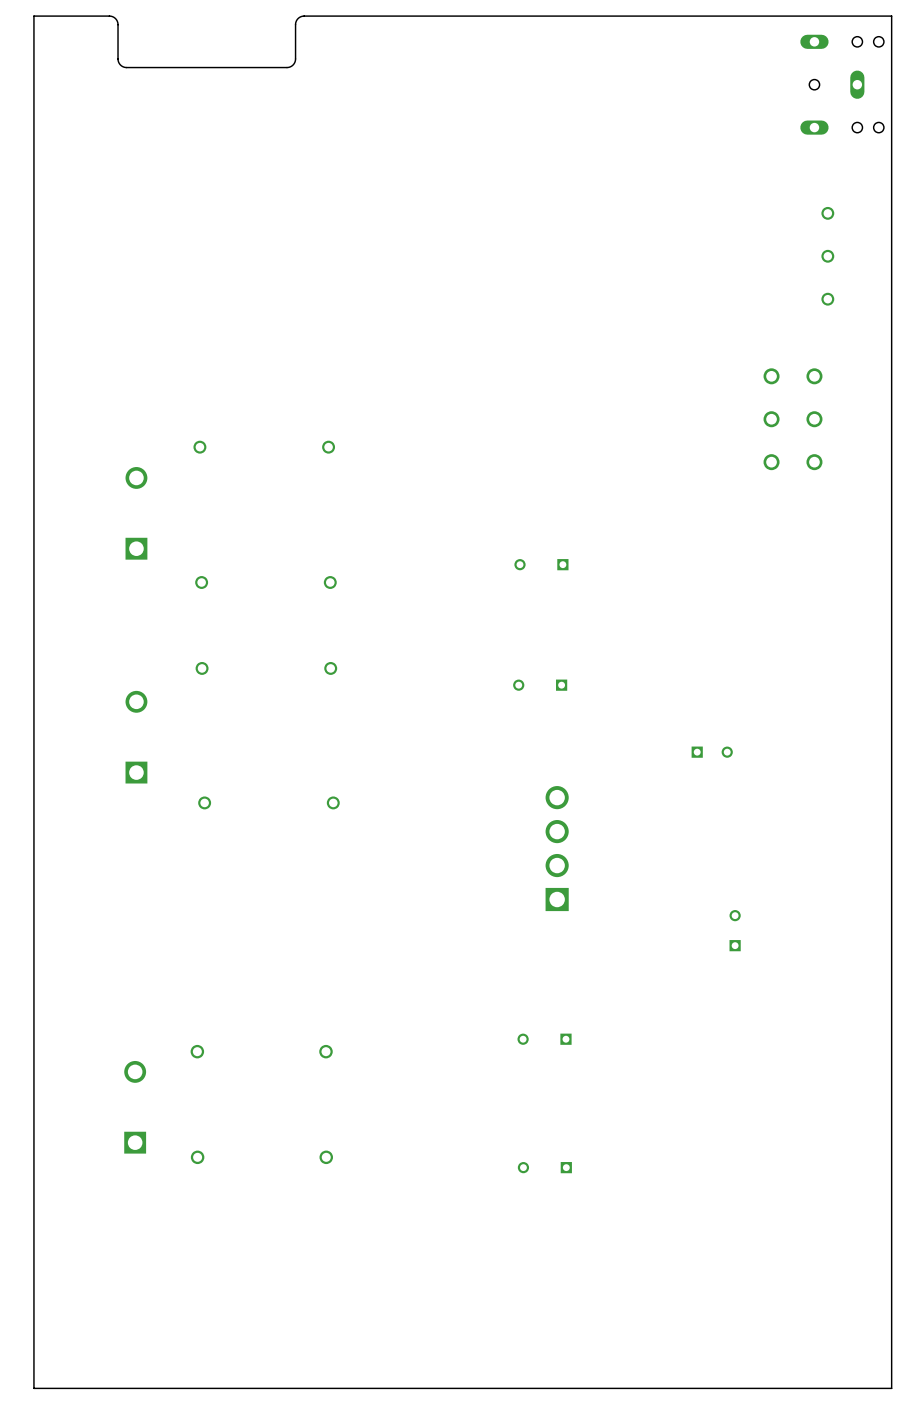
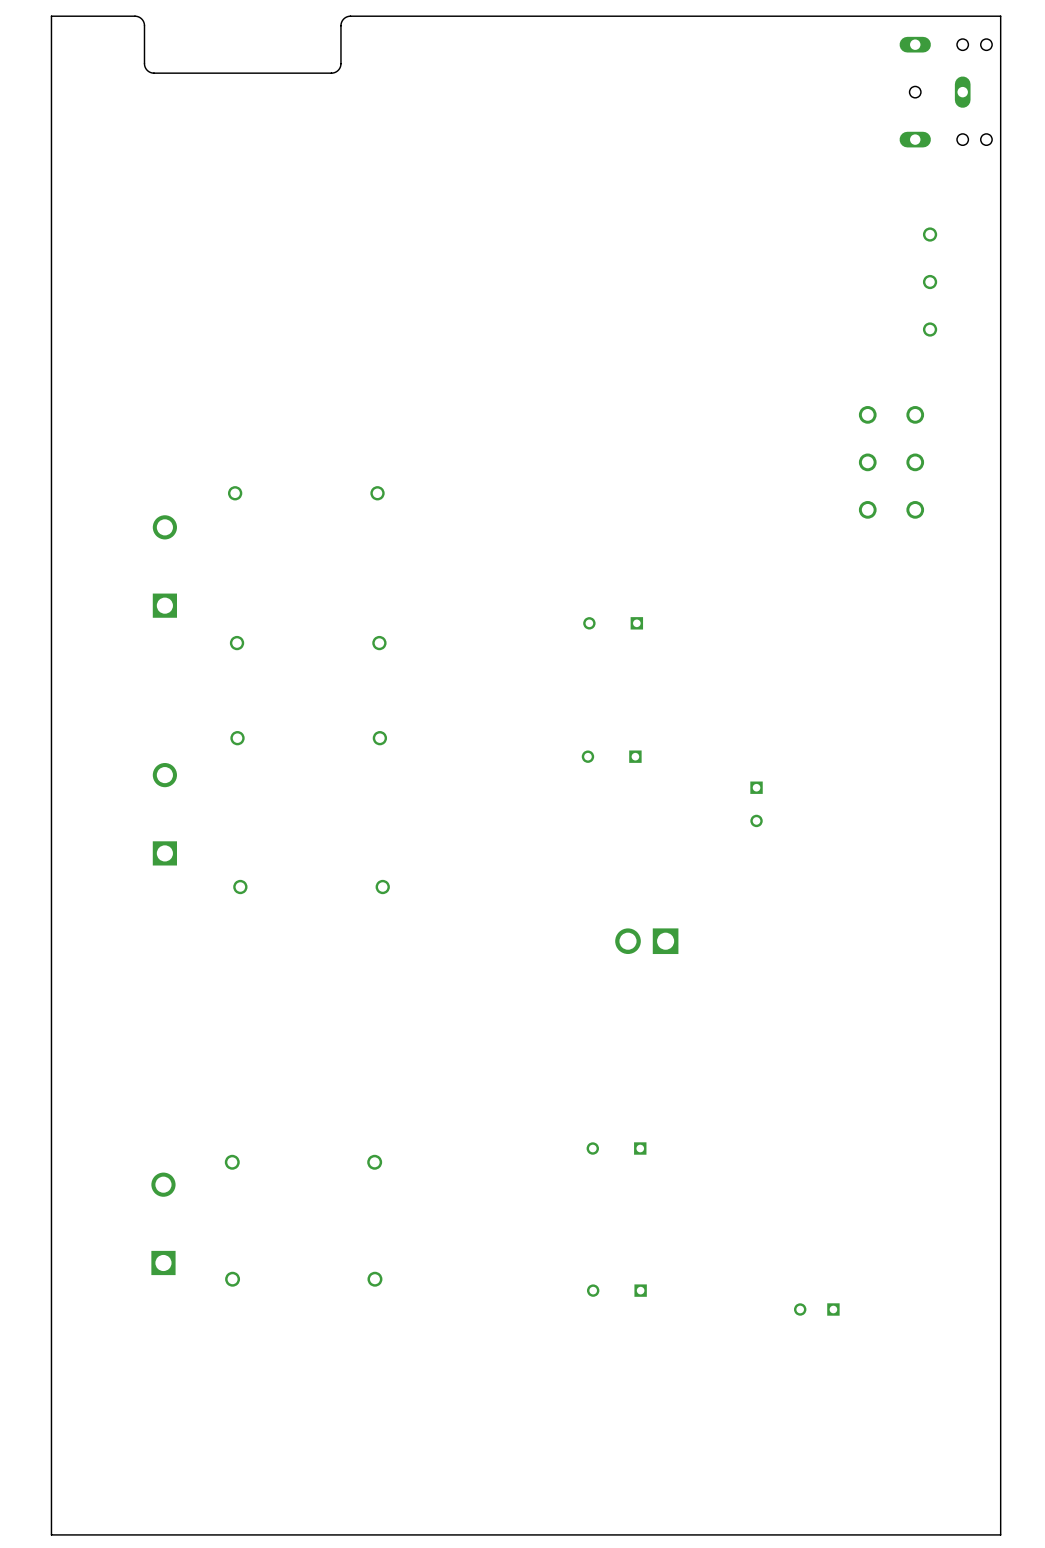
part rotation: 0° (712, 752) -> 90° clockwise (756, 804)
part position: (712, 752) -> (756, 804)
part: (557, 848) -> none
part: none -> (646, 941)
part: (735, 930) -> none
part: none -> (816, 1309)

